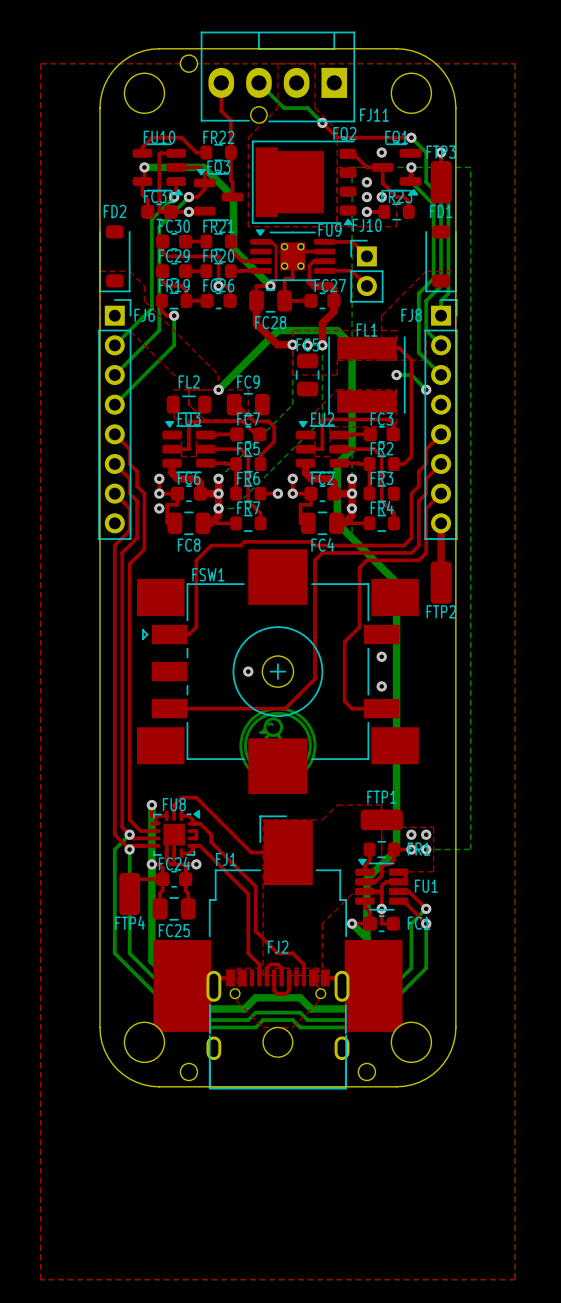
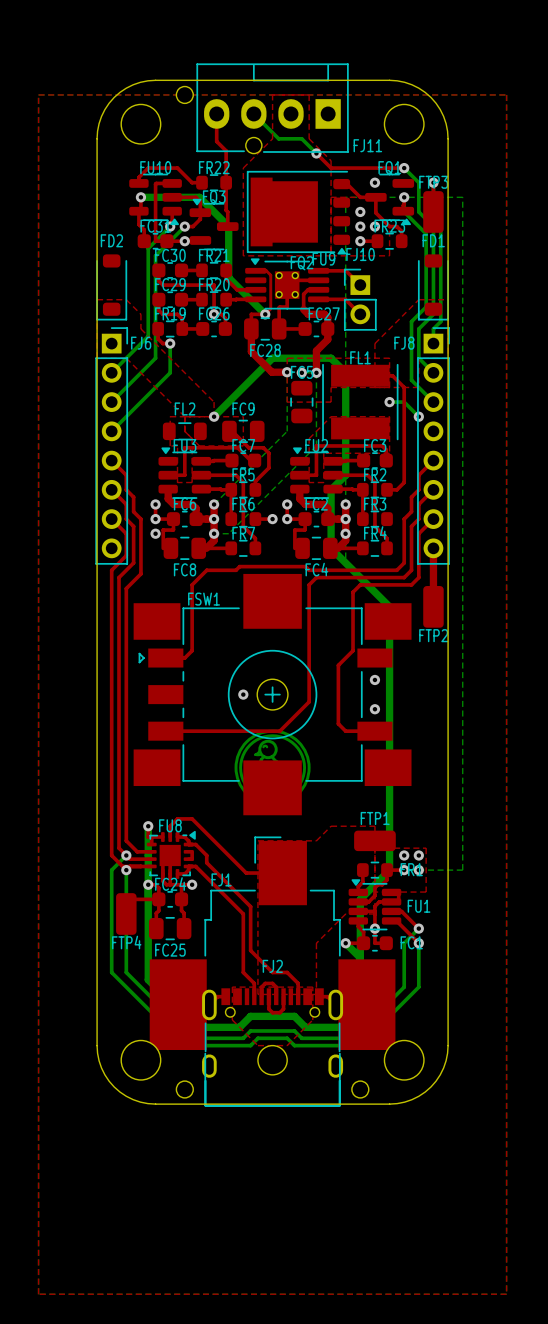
FQ2 name position: FQ2 (344, 134) -> FQ2 (302, 263)

